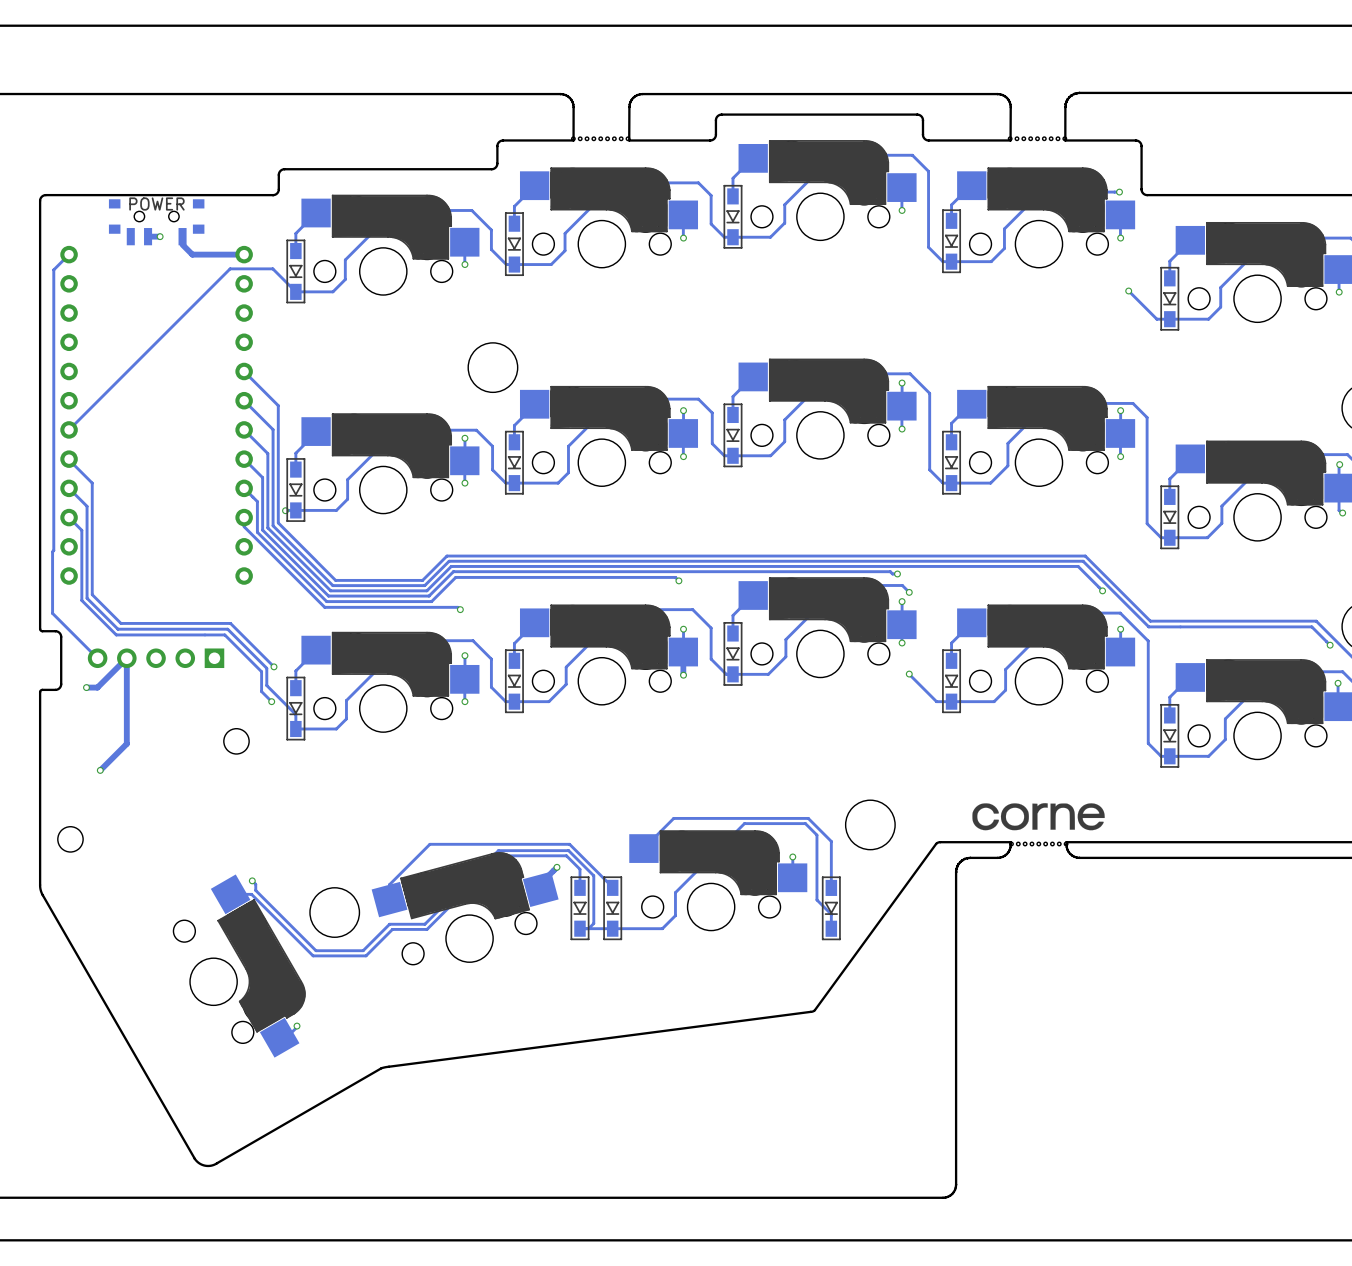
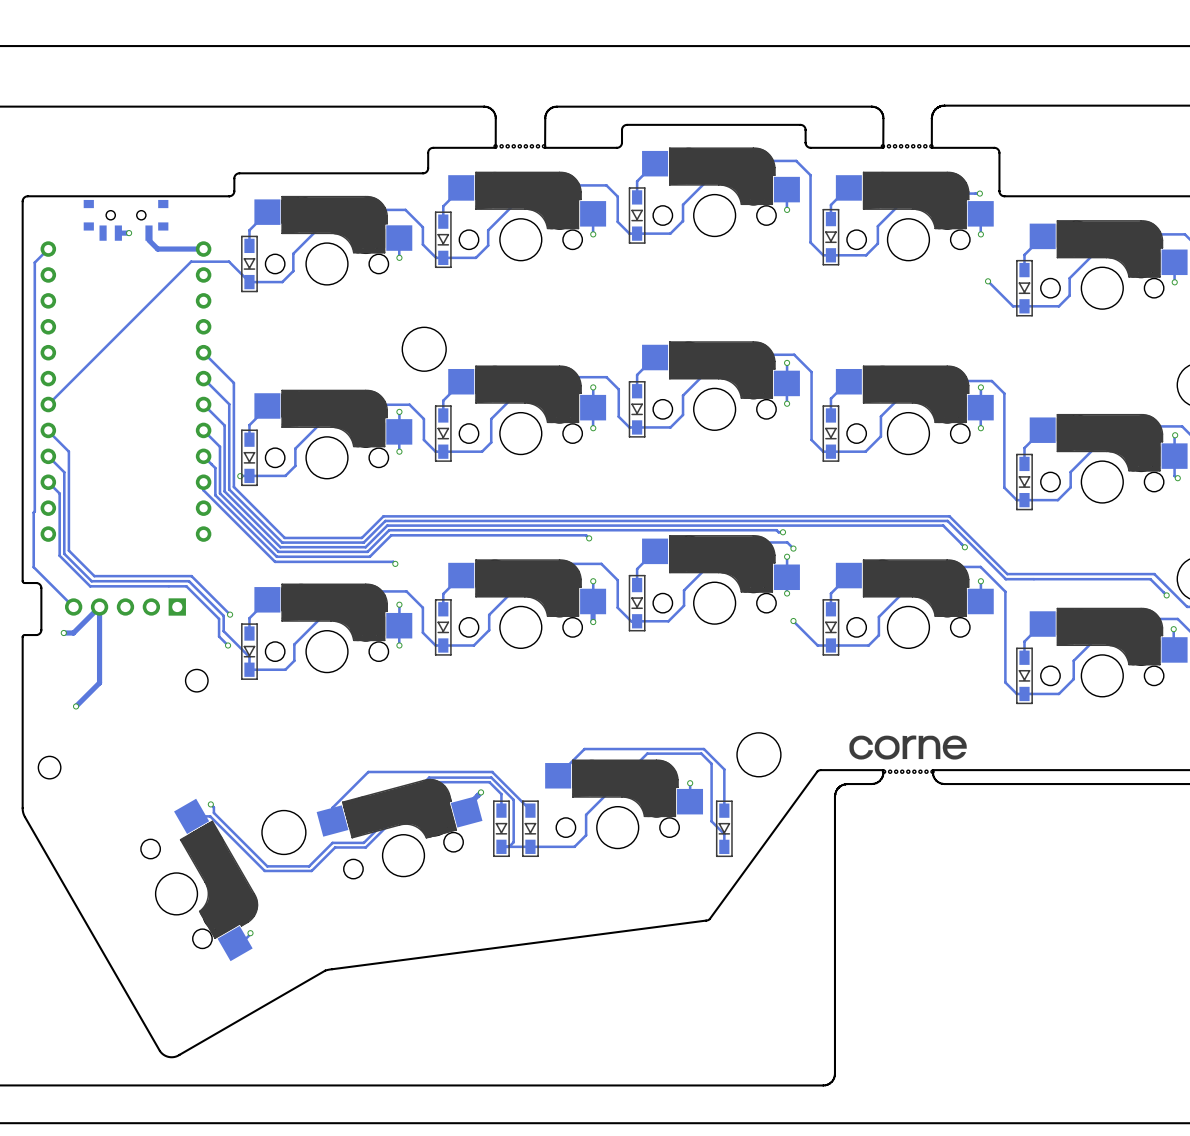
part value: POWER (156, 204) -> none

